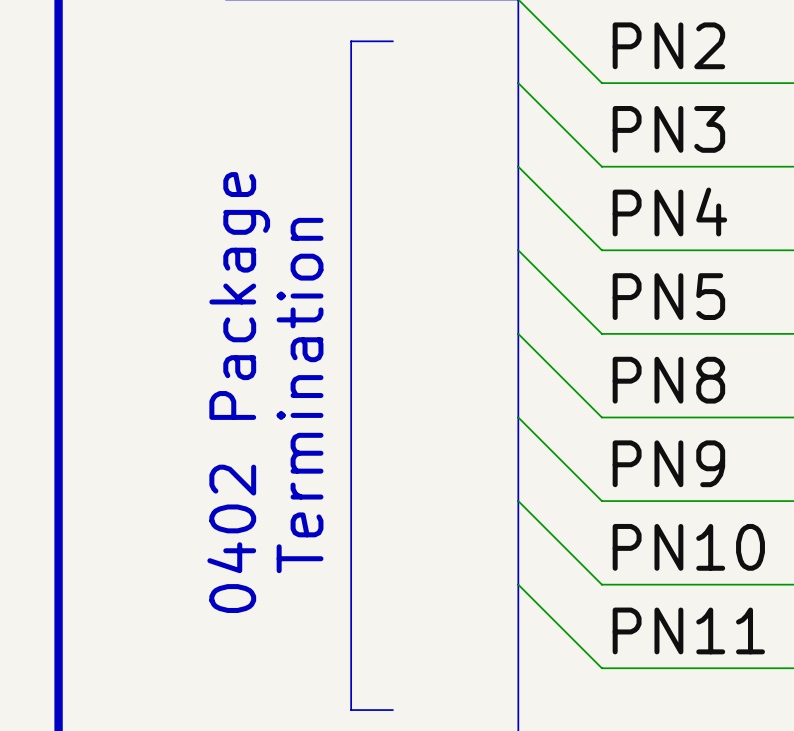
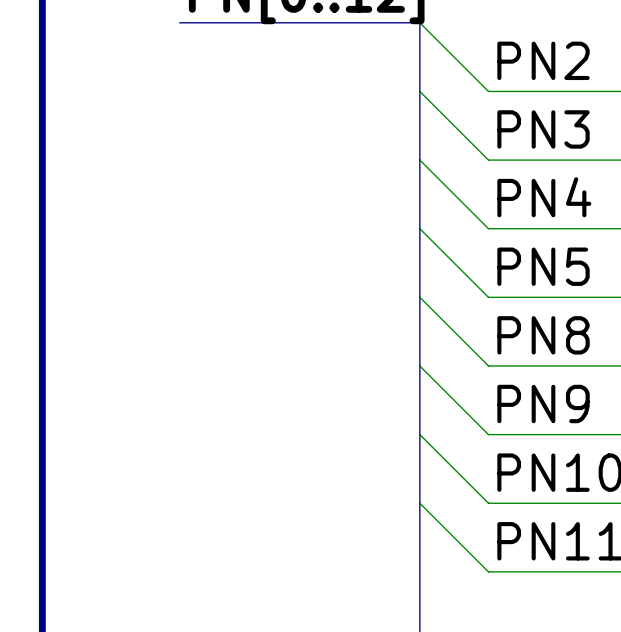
line: (392, 41) (351, 41) (351, 710) (392, 710) -> none
text: 0402 Package (238, 392) -> none
text: Termination (300, 395) -> none

